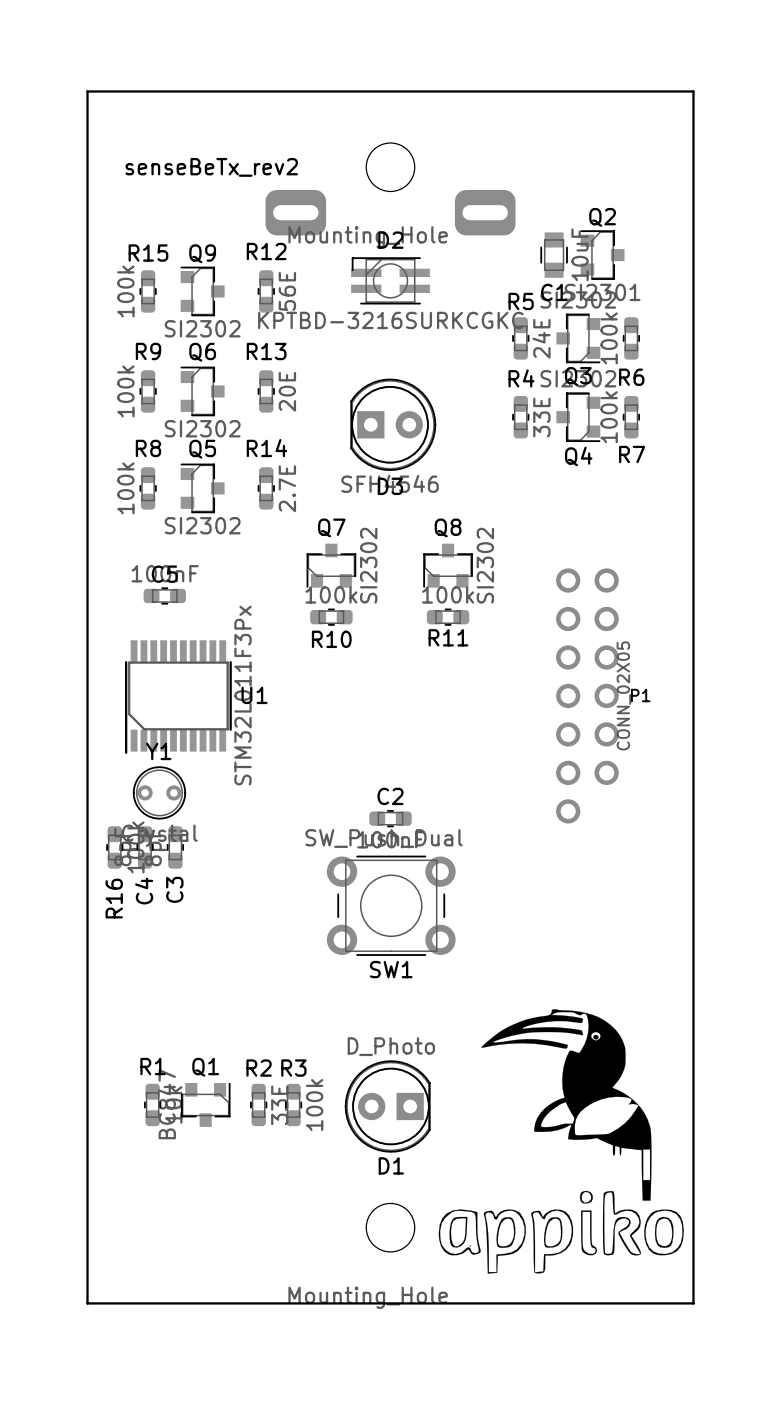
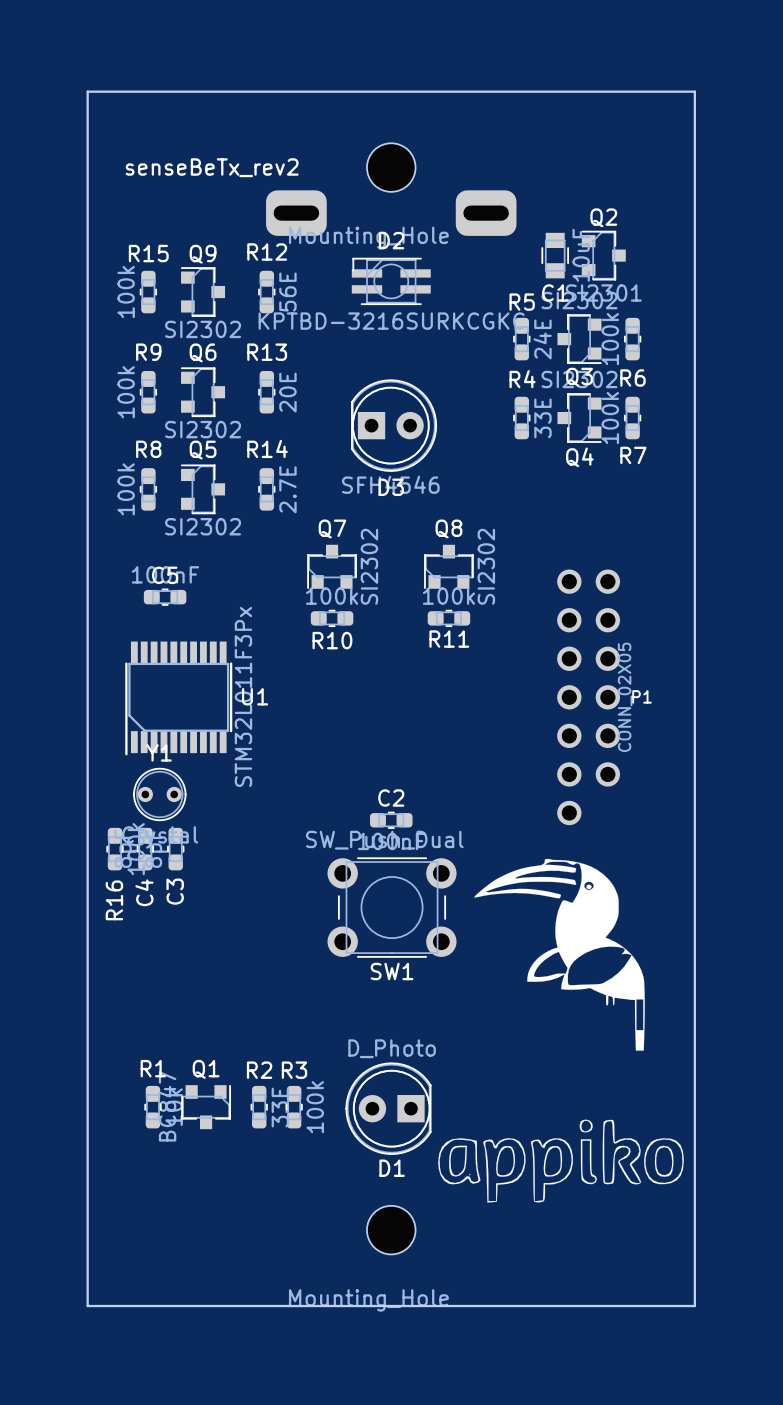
drawing position: (566, 1104) -> (559, 954)
drawing position: (561, 1232) -> (561, 1161)

